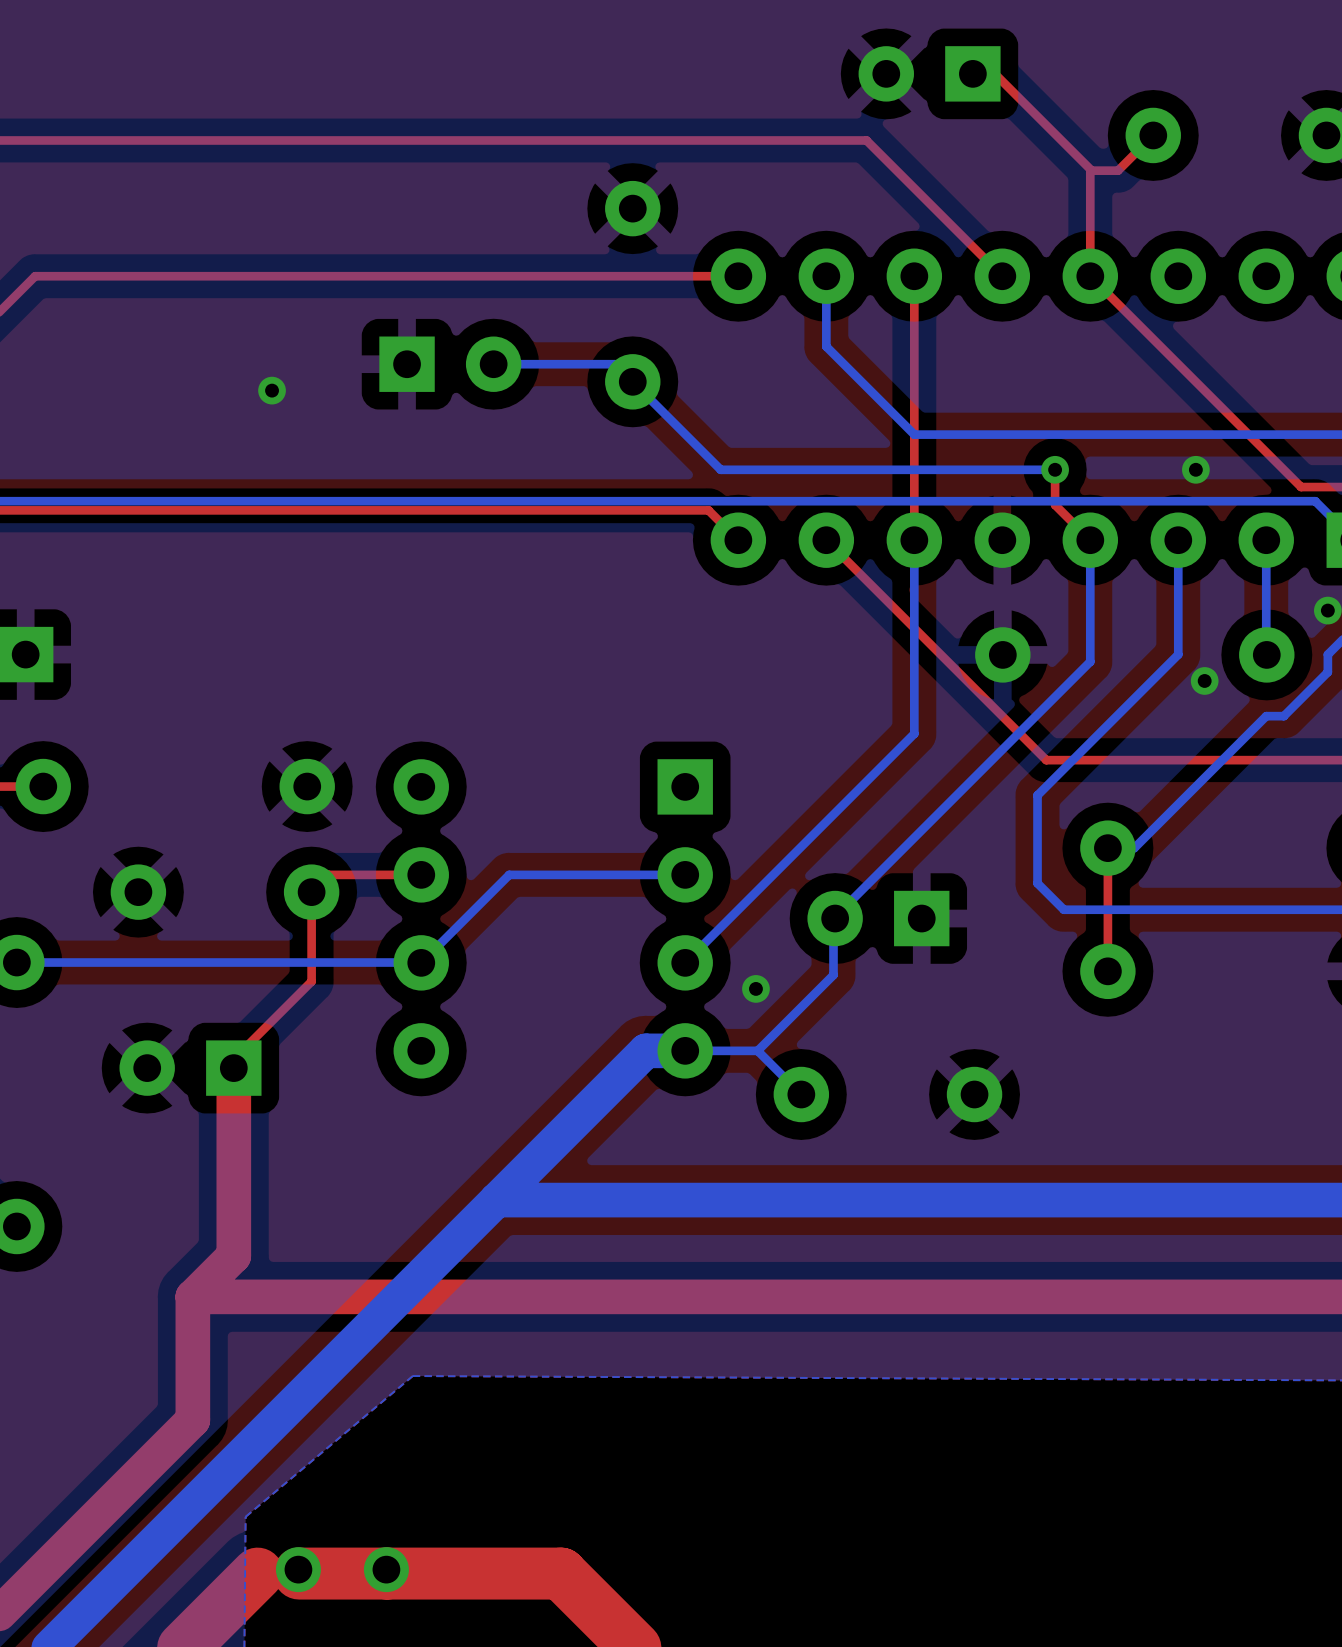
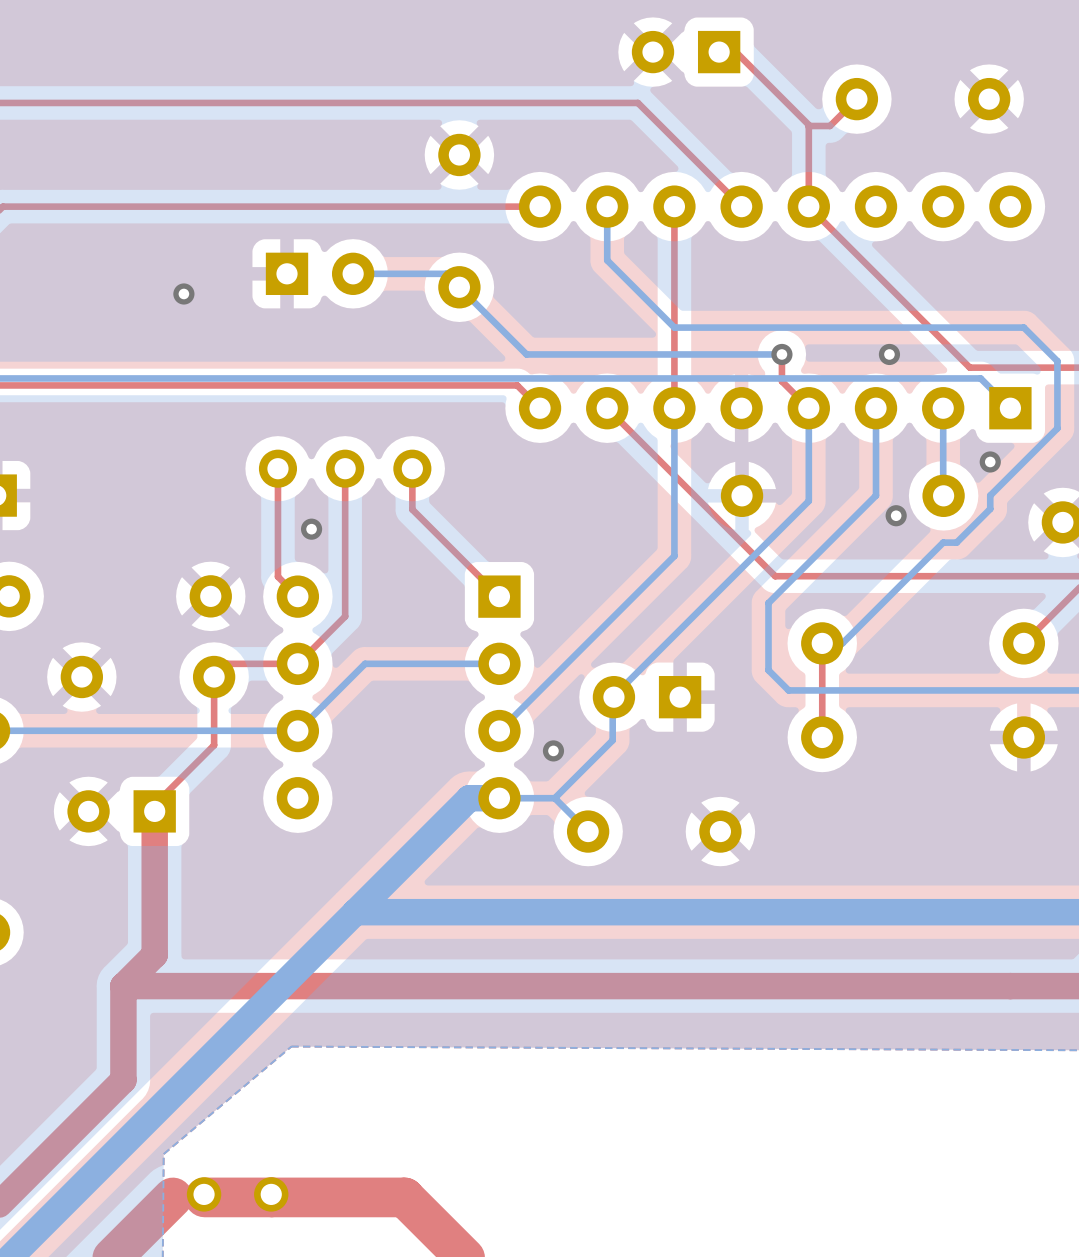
top track: none -> (277, 468) (277, 576) (297, 596)
top track: none -> (345, 468) (345, 616) (297, 663)
part: none -> (345, 468)
top track: none -> (412, 468) (412, 509) (499, 596)
via: none -> (311, 529)

